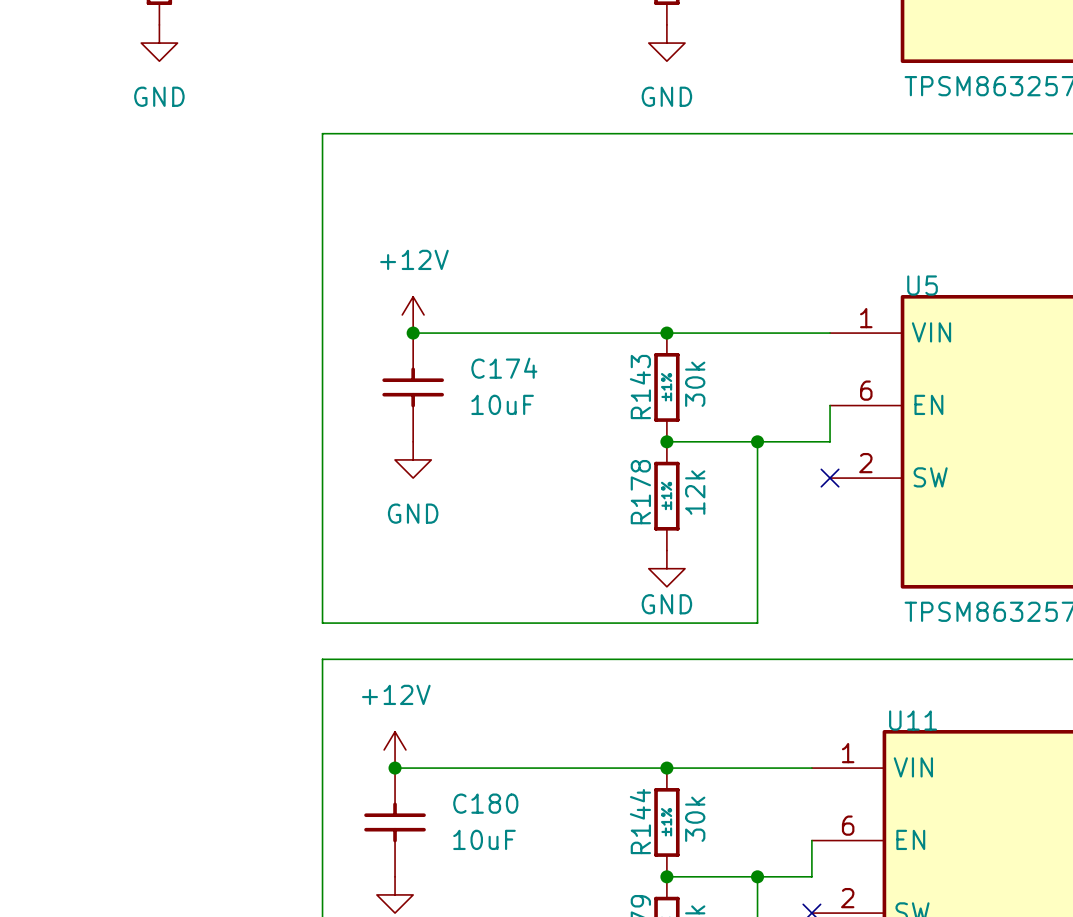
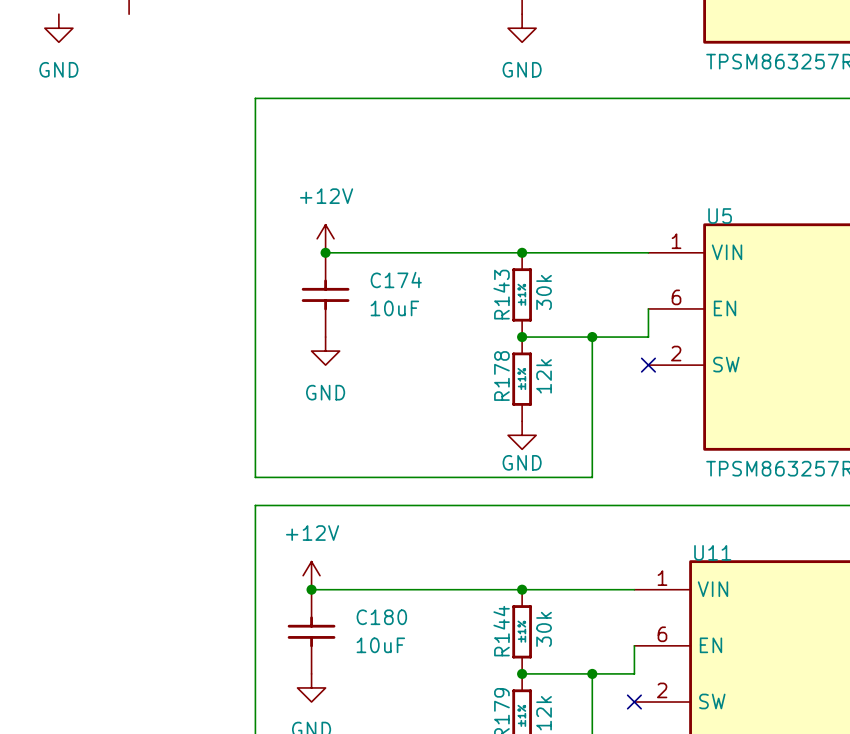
power symbol position: GND (159, 43) -> GND (58, 28)

